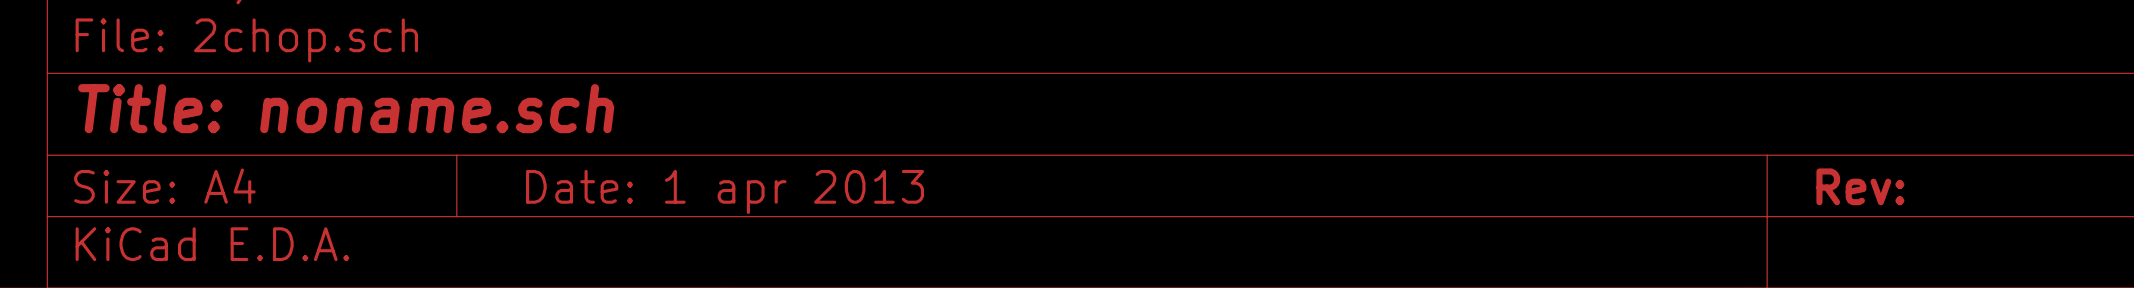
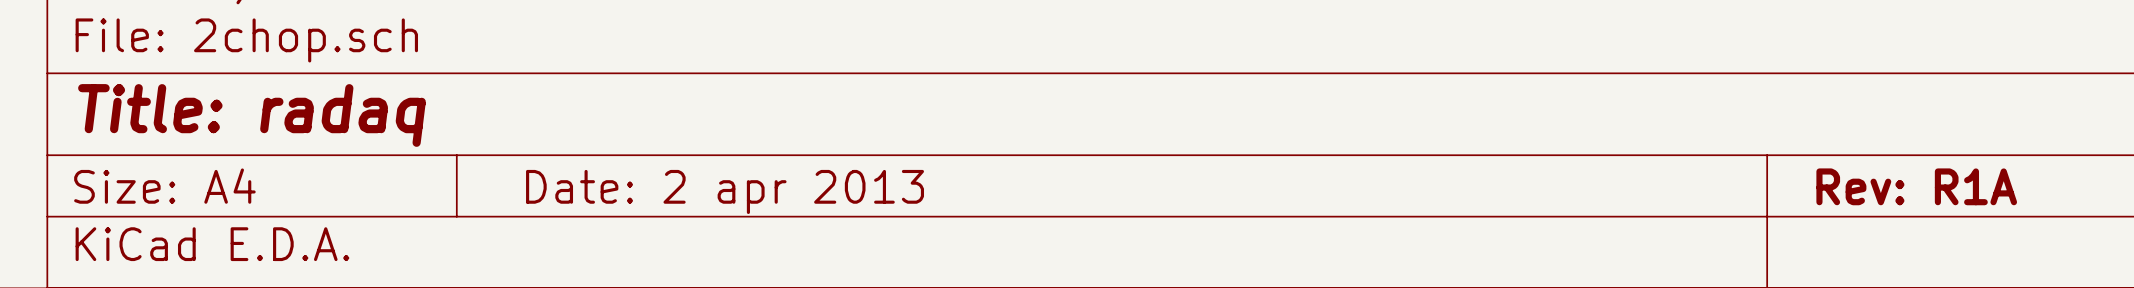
title block: Title: noname.sch (346, 108) -> Title: radaq (251, 115)
title block: Rev: (1860, 186) -> Rev: R1A (1916, 186)
title block: Date: 1 apr 2013 (725, 191) -> Date: 2 apr 2013 (725, 191)

